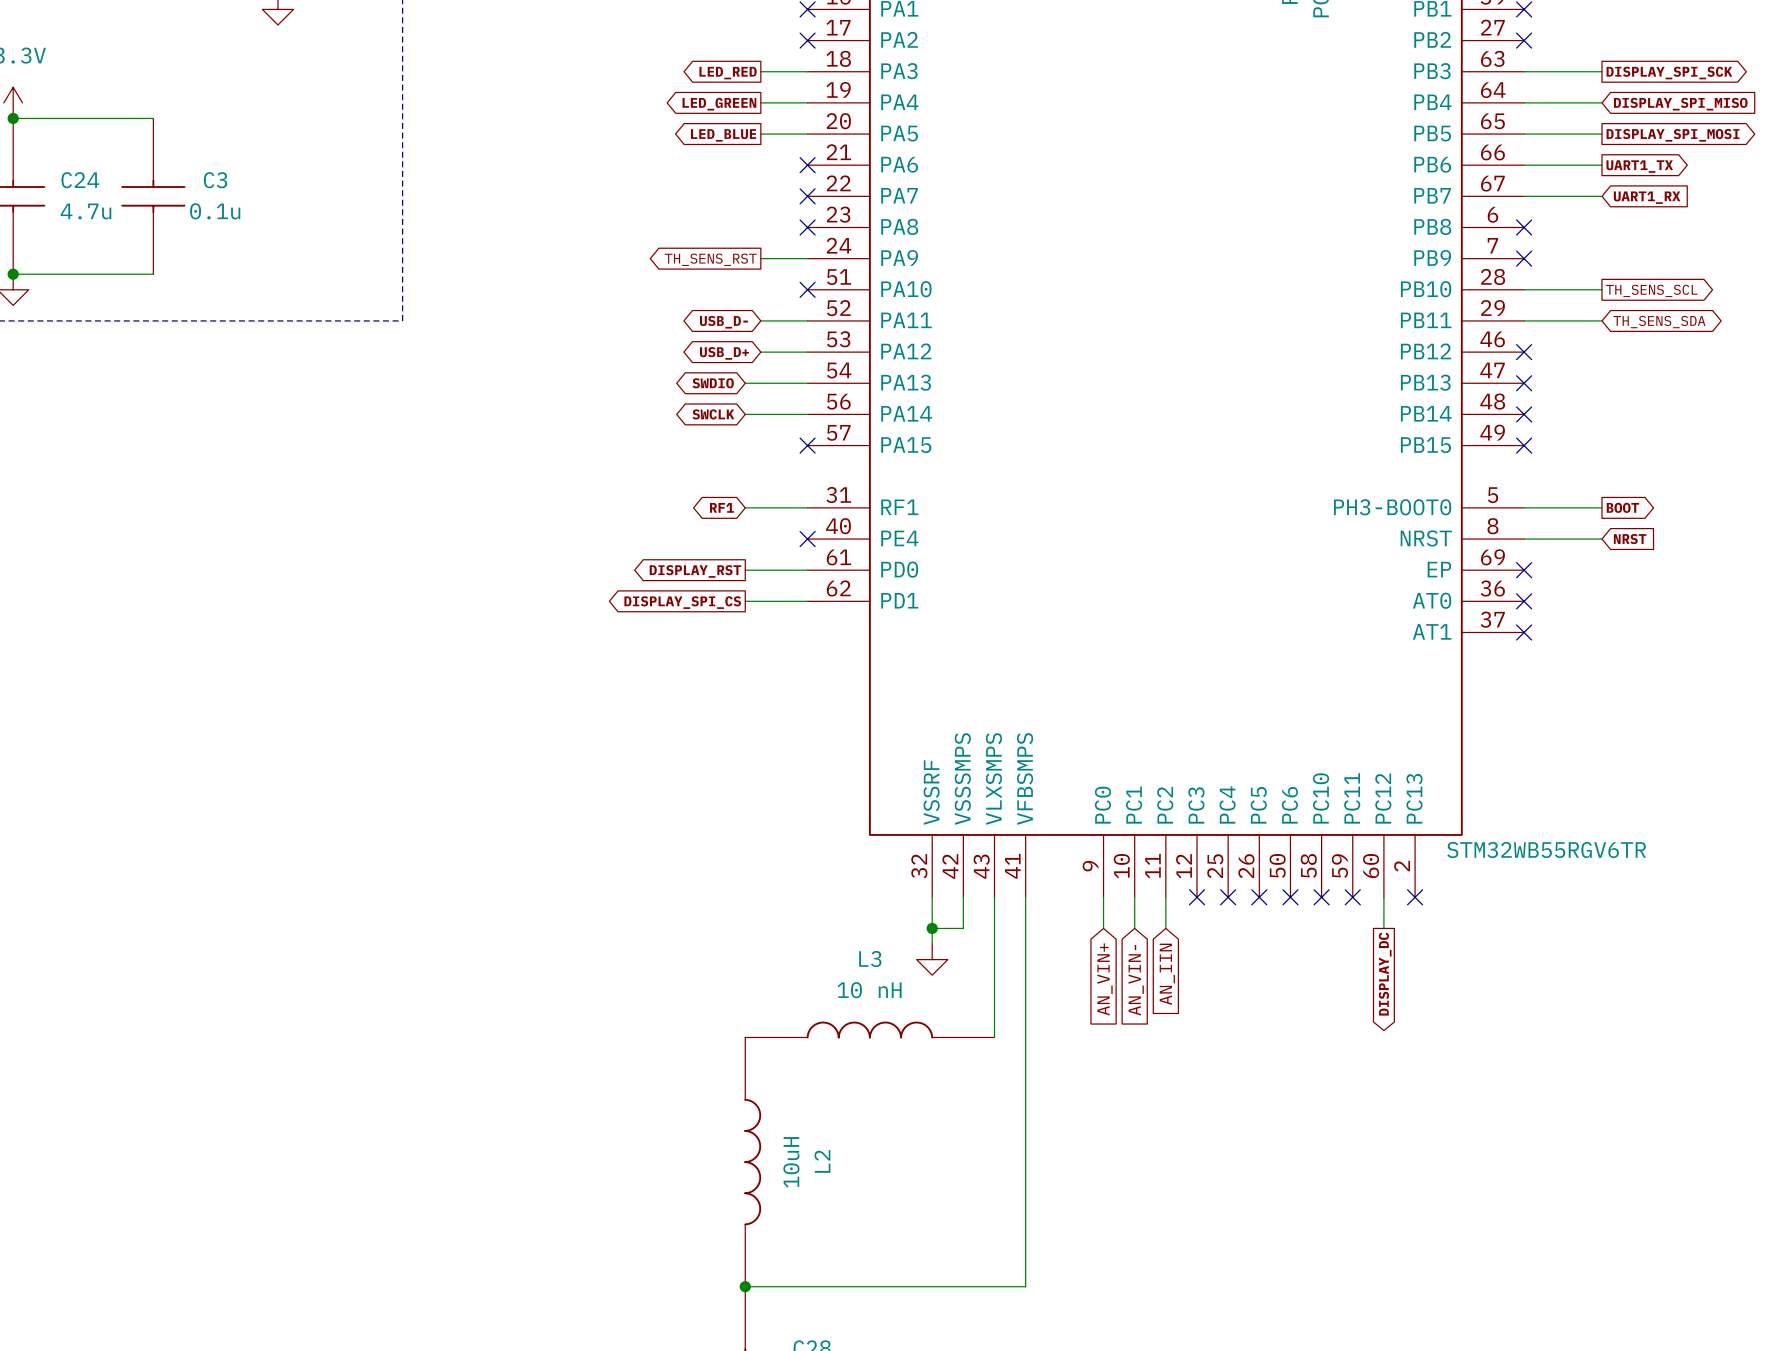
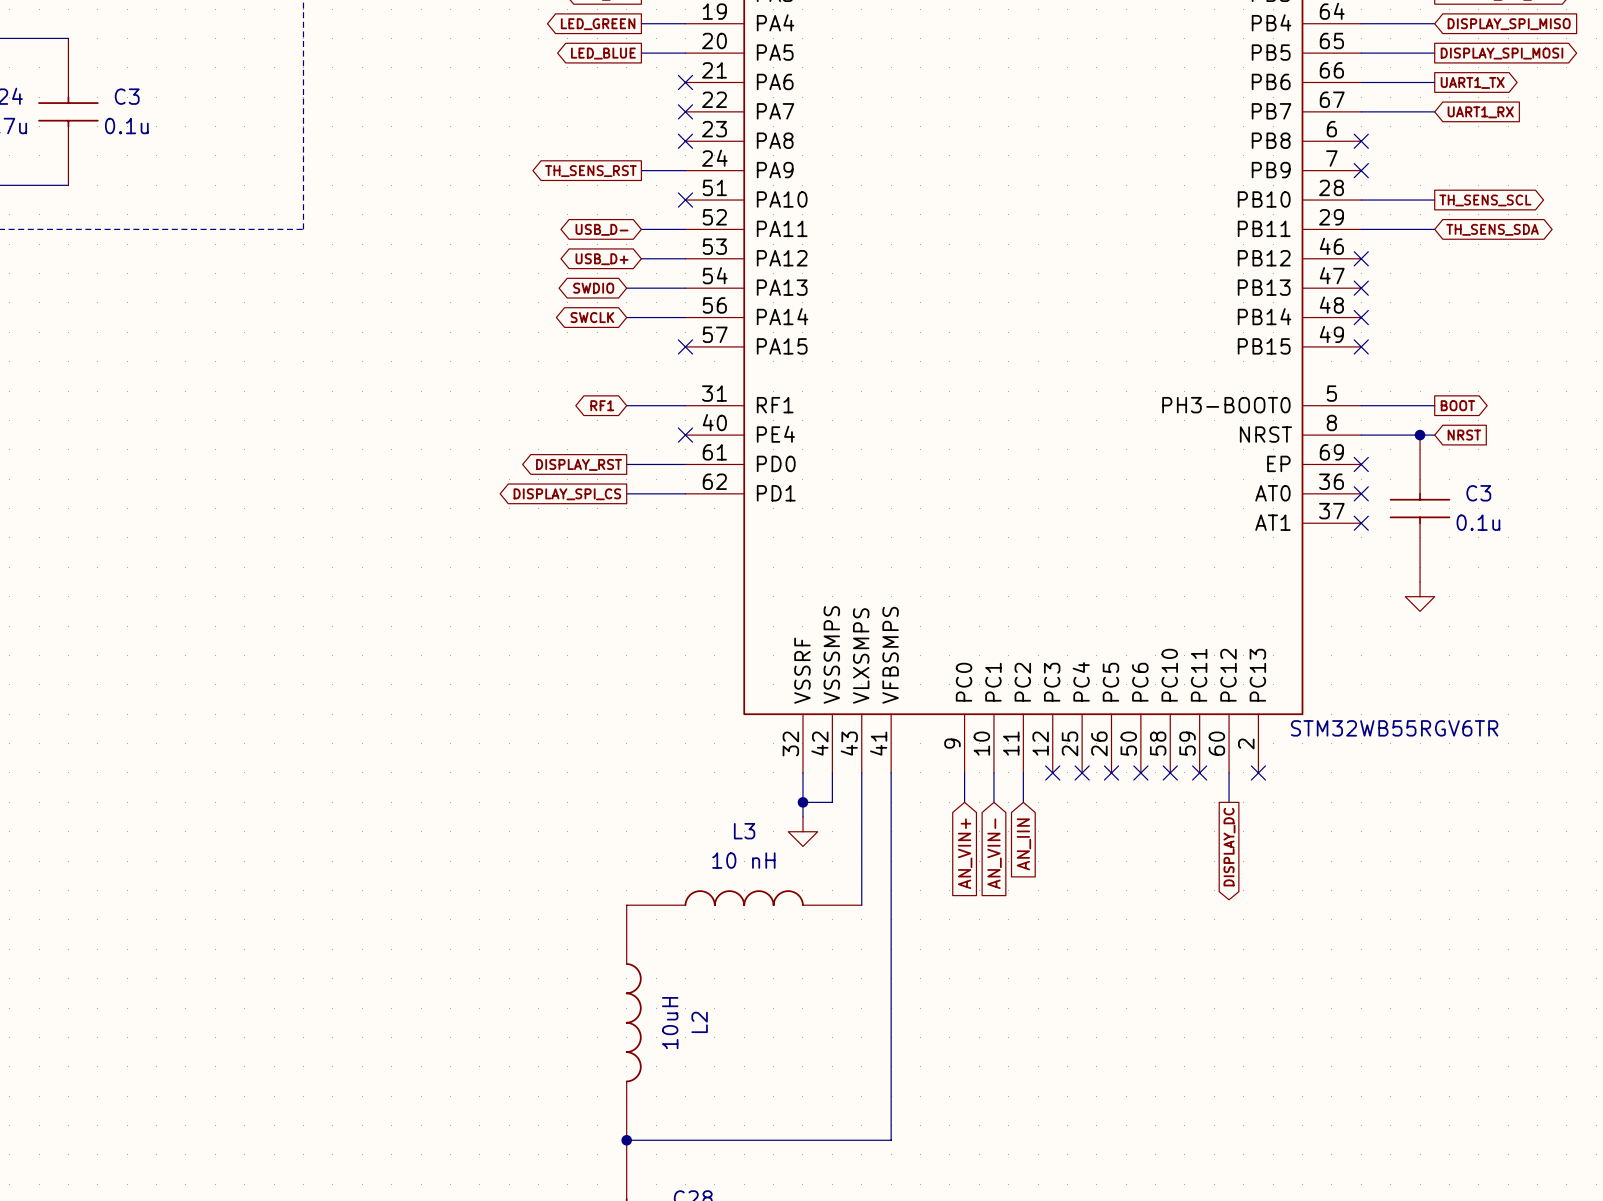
junction: none -> (1420, 435)
C3: none -> 0.1u (1420, 508)
power symbol: none -> (1420, 596)

